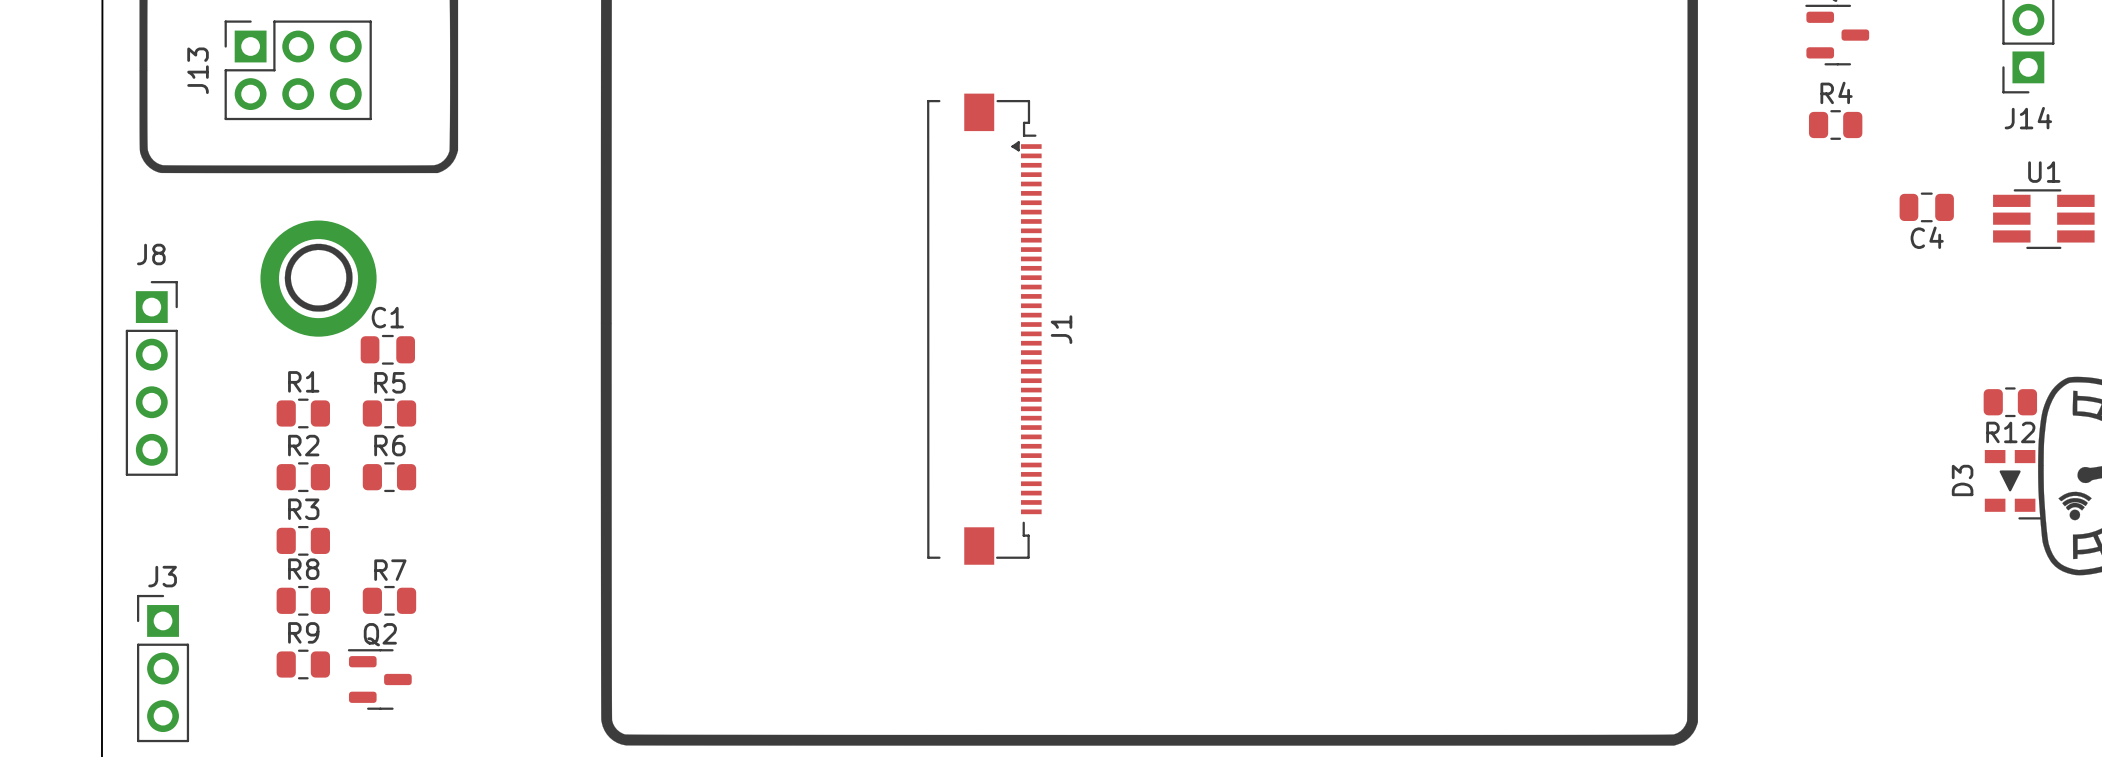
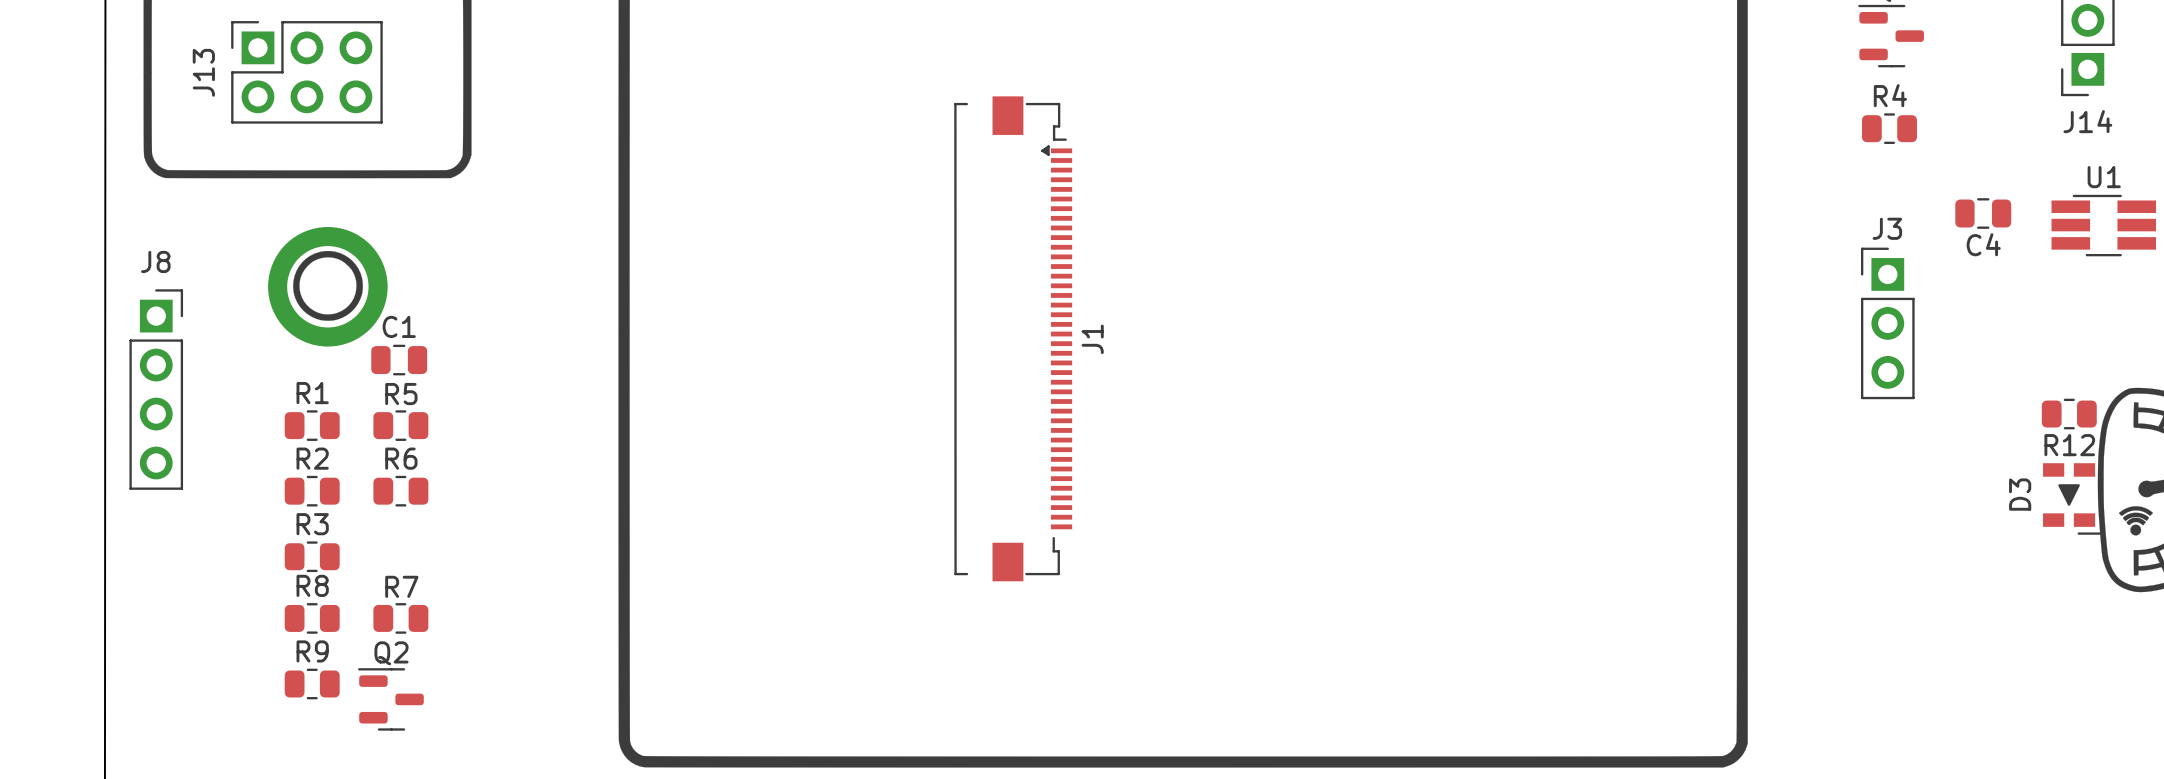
J3 position: (163, 668) -> (1887, 323)

